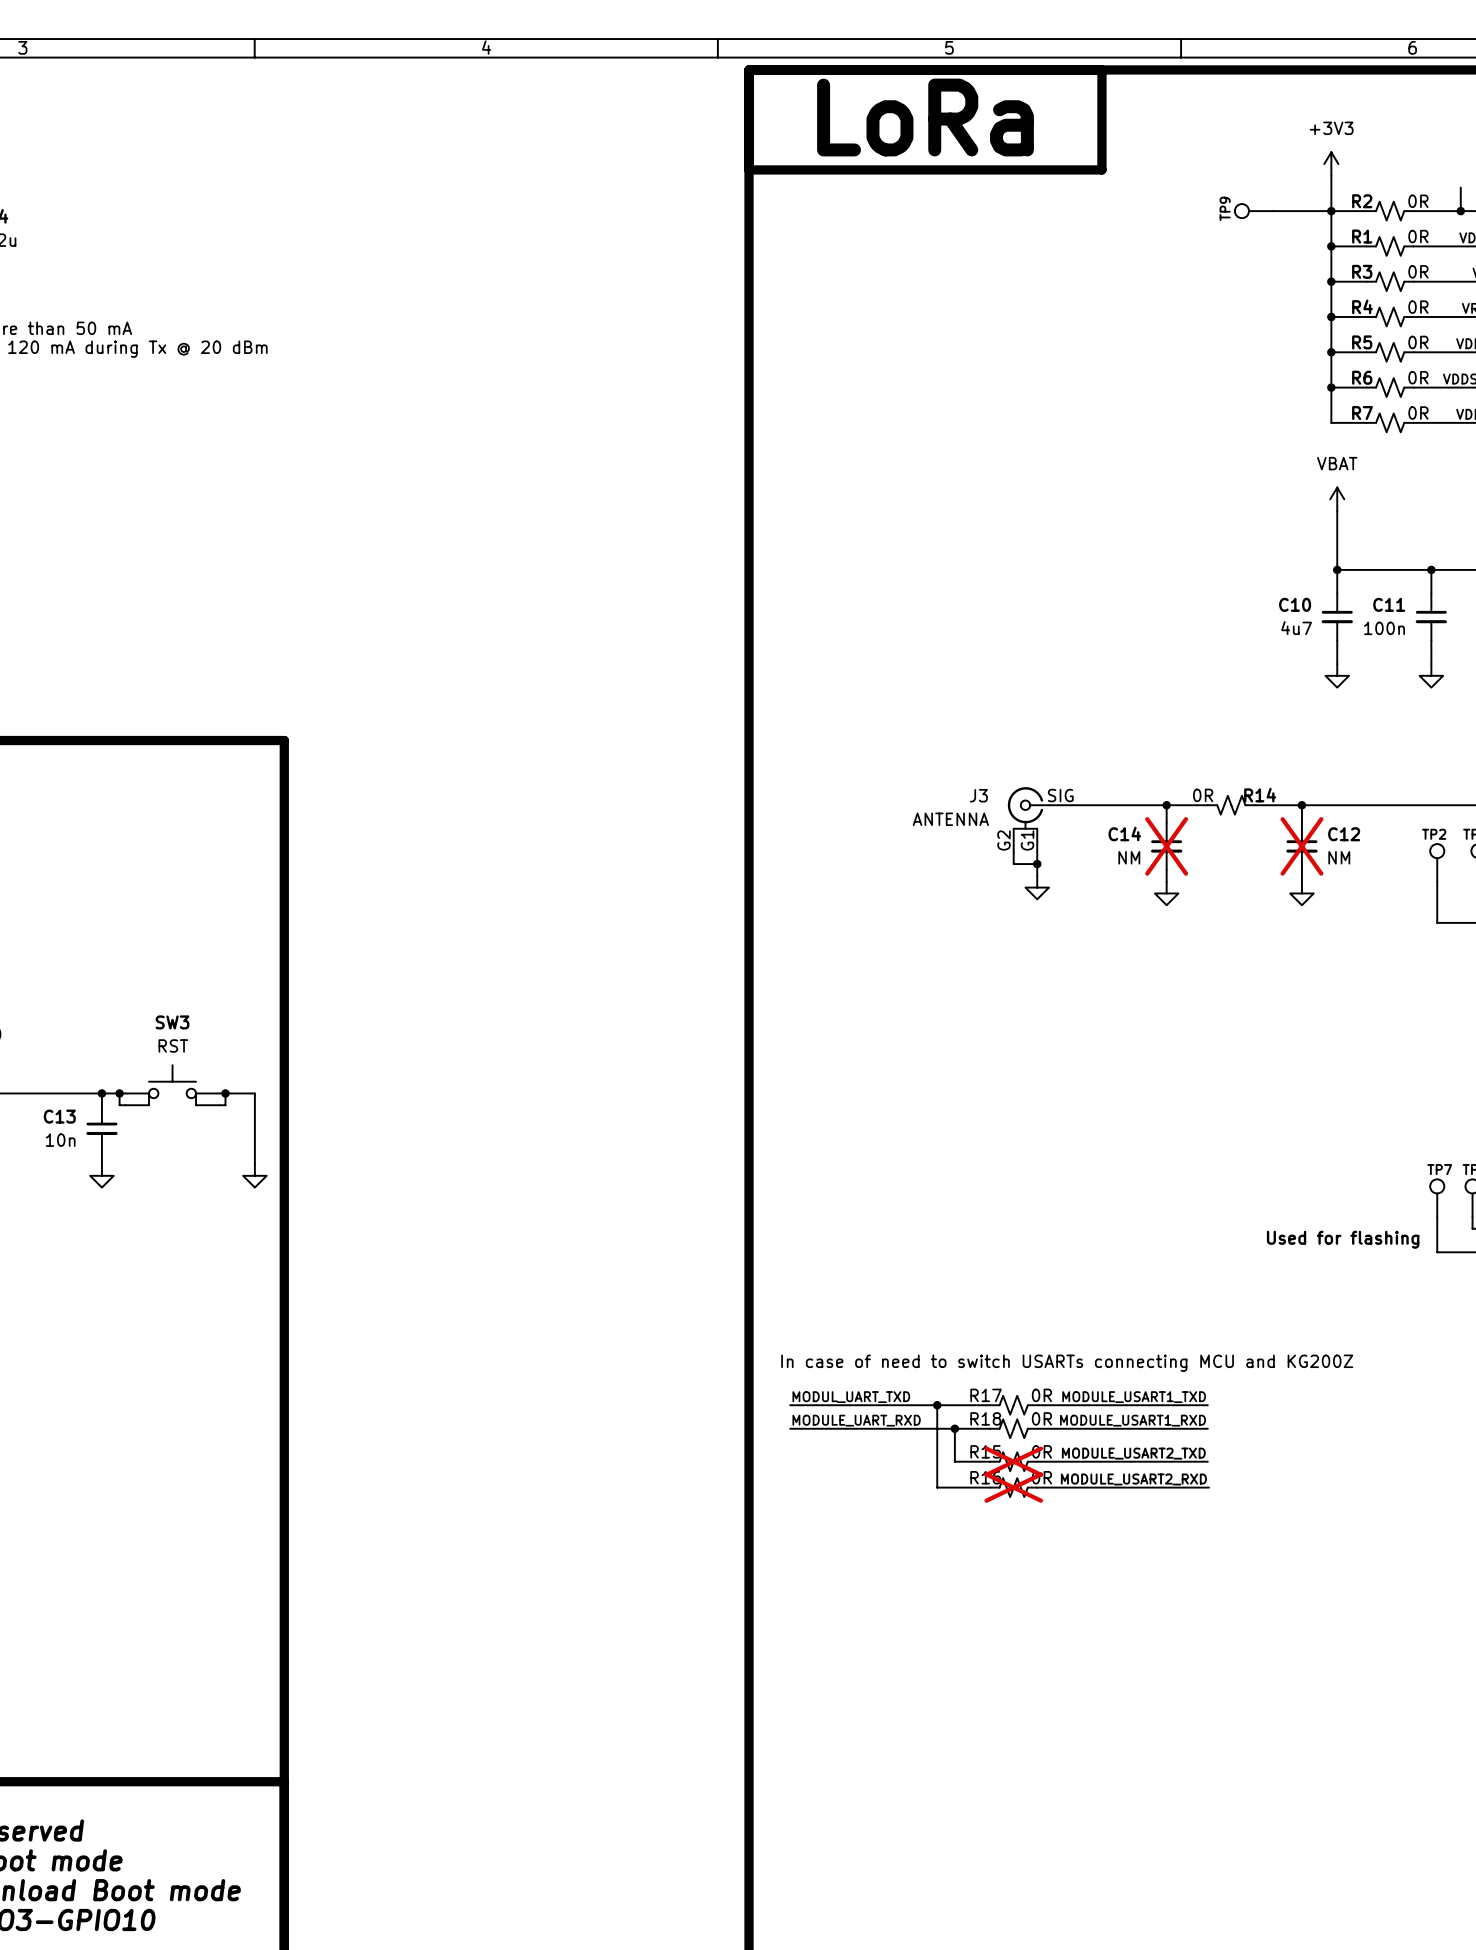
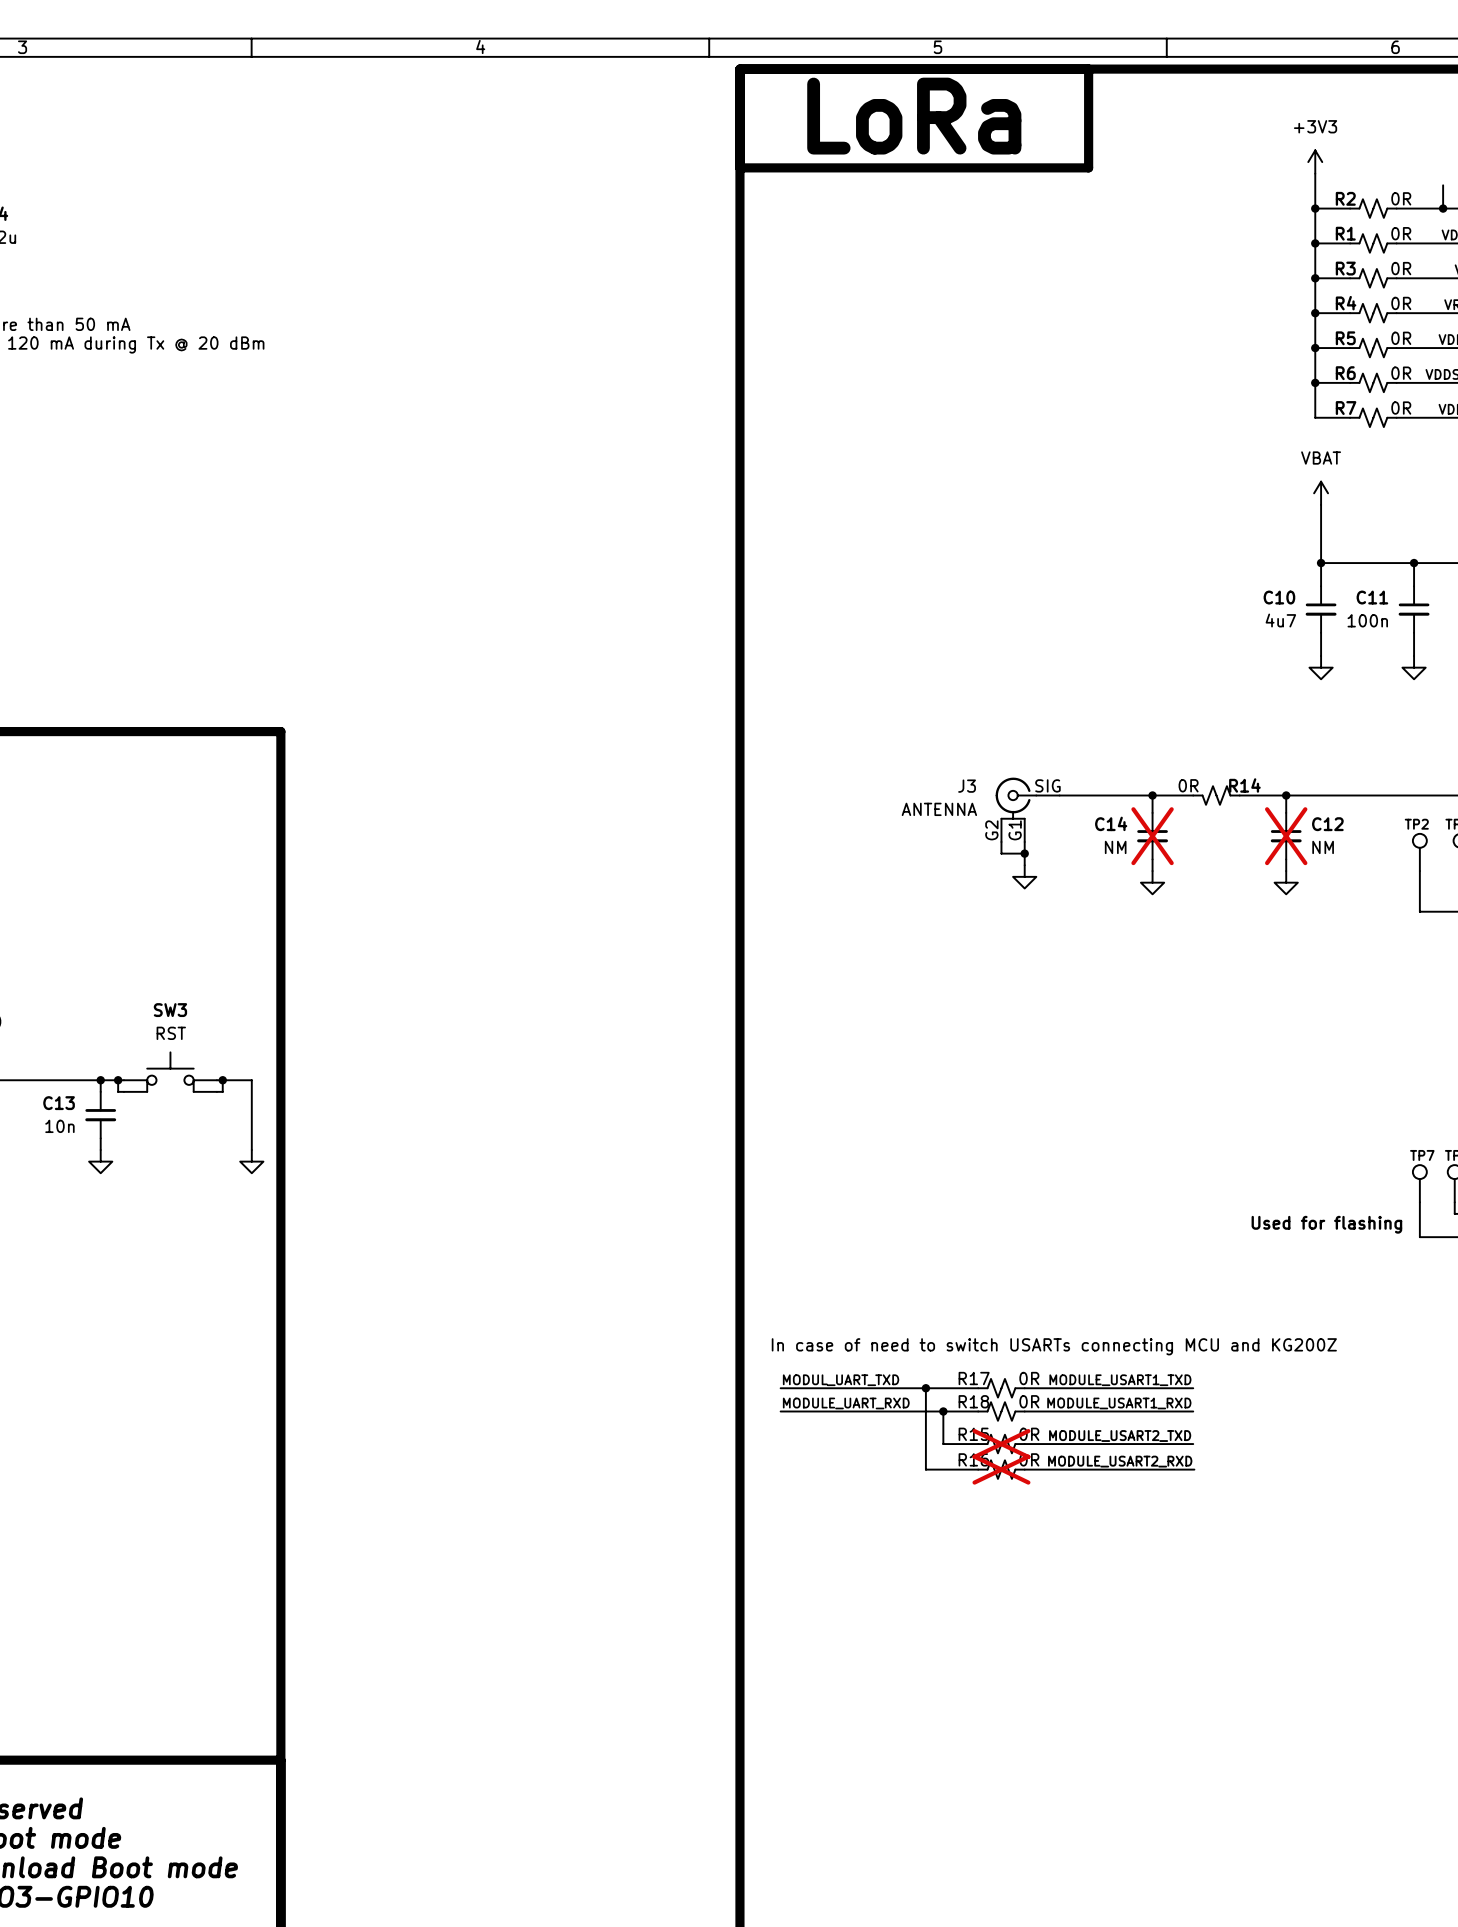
TP9: (1253, 211) -> none
wire: (1272, 211) (1331, 211) -> none

